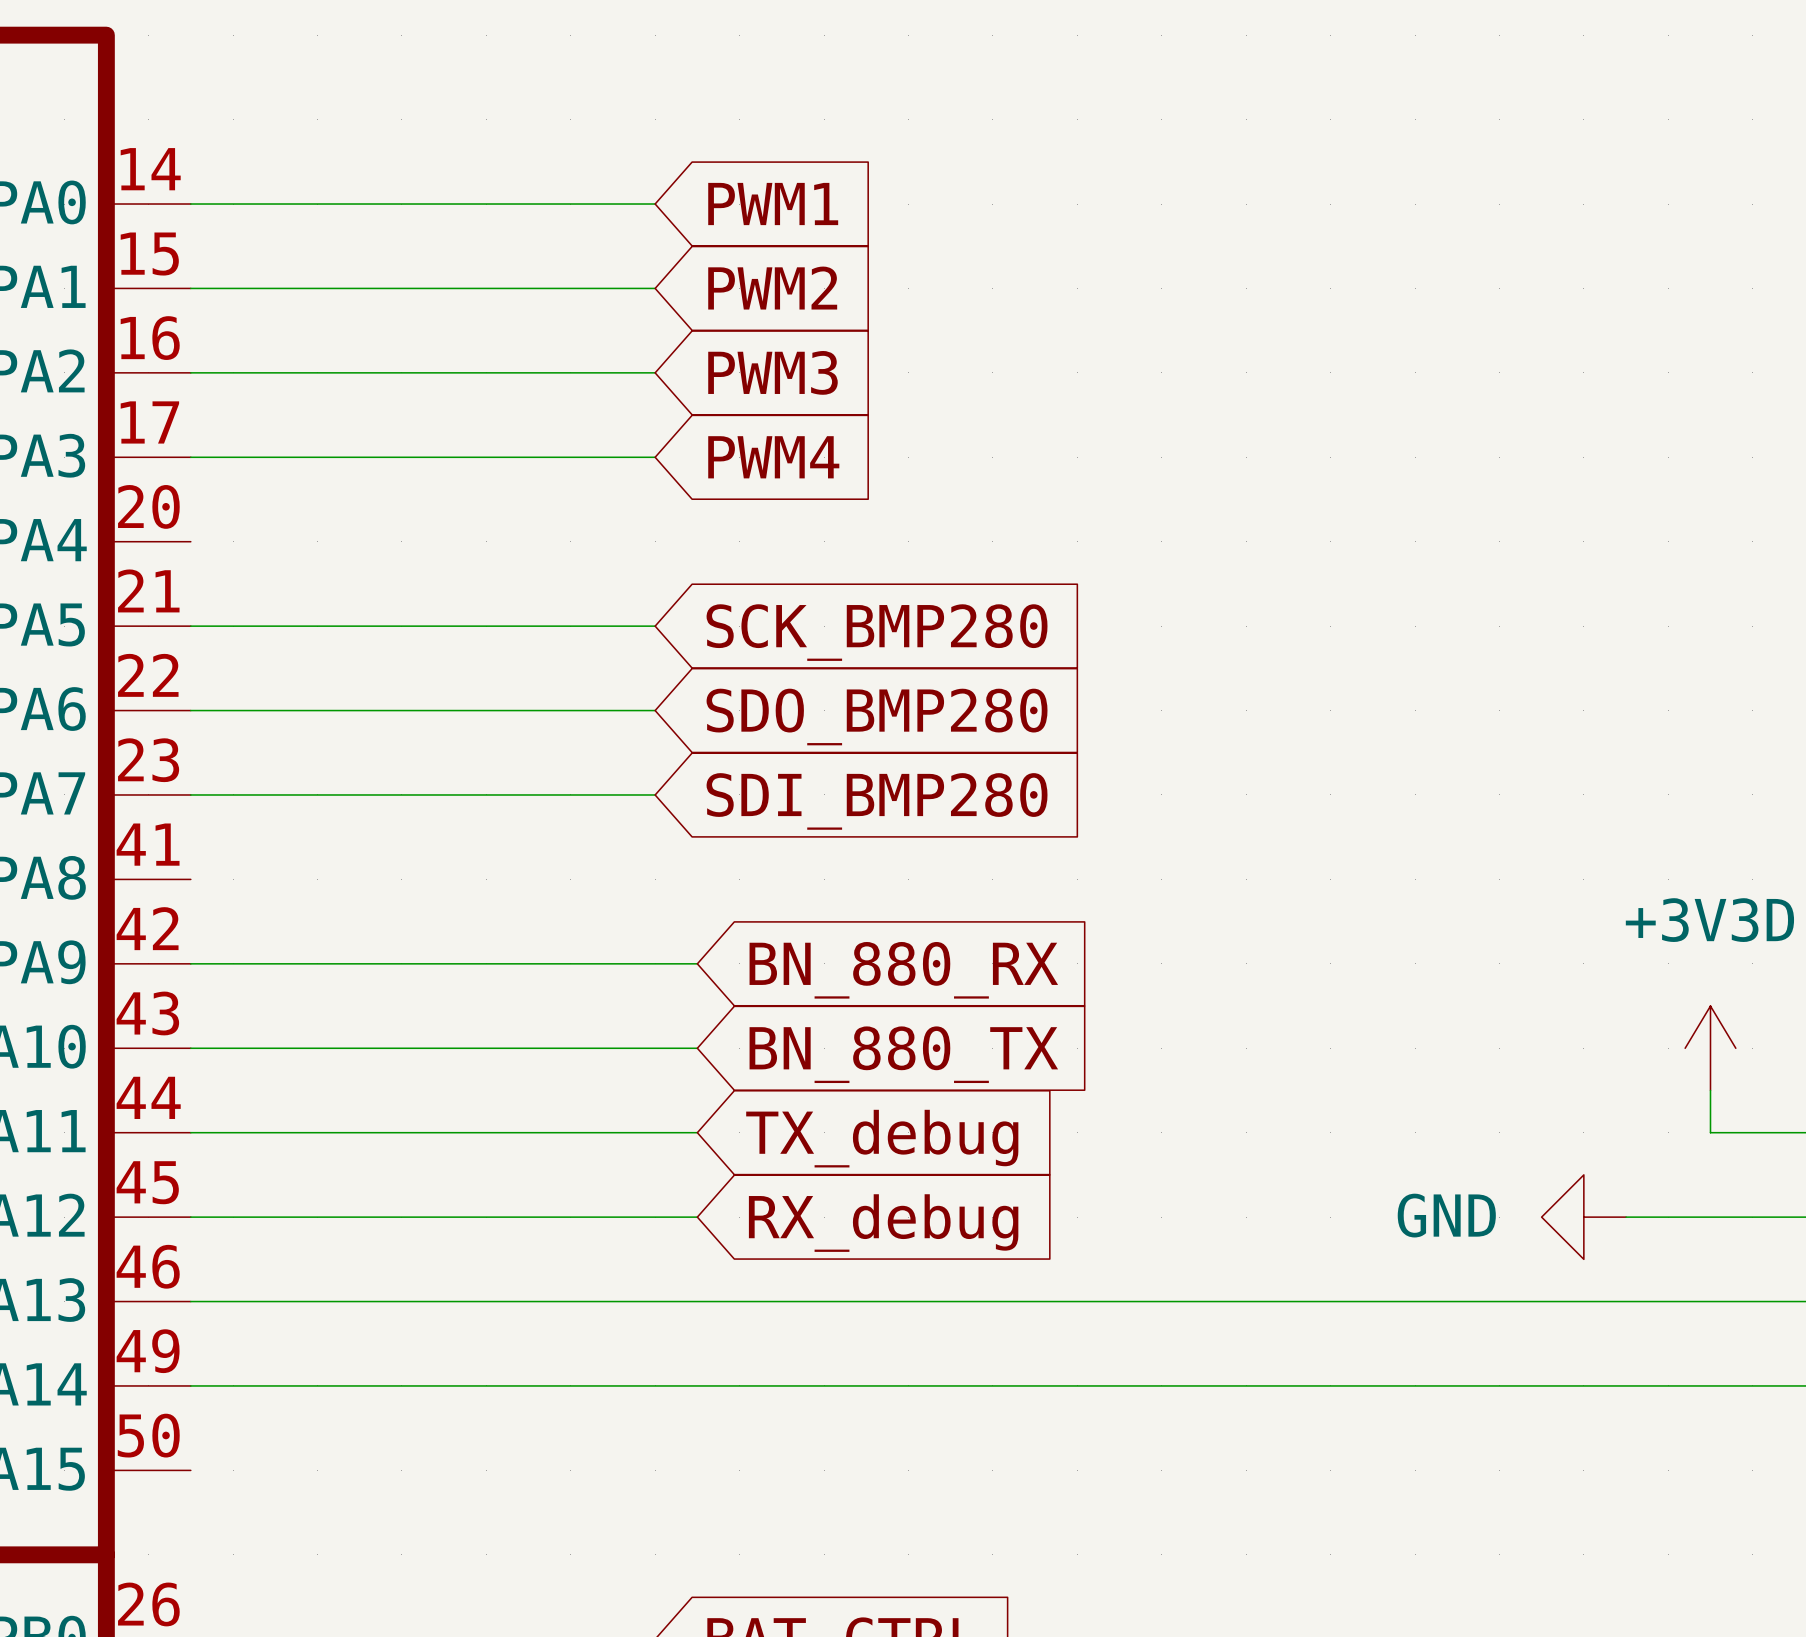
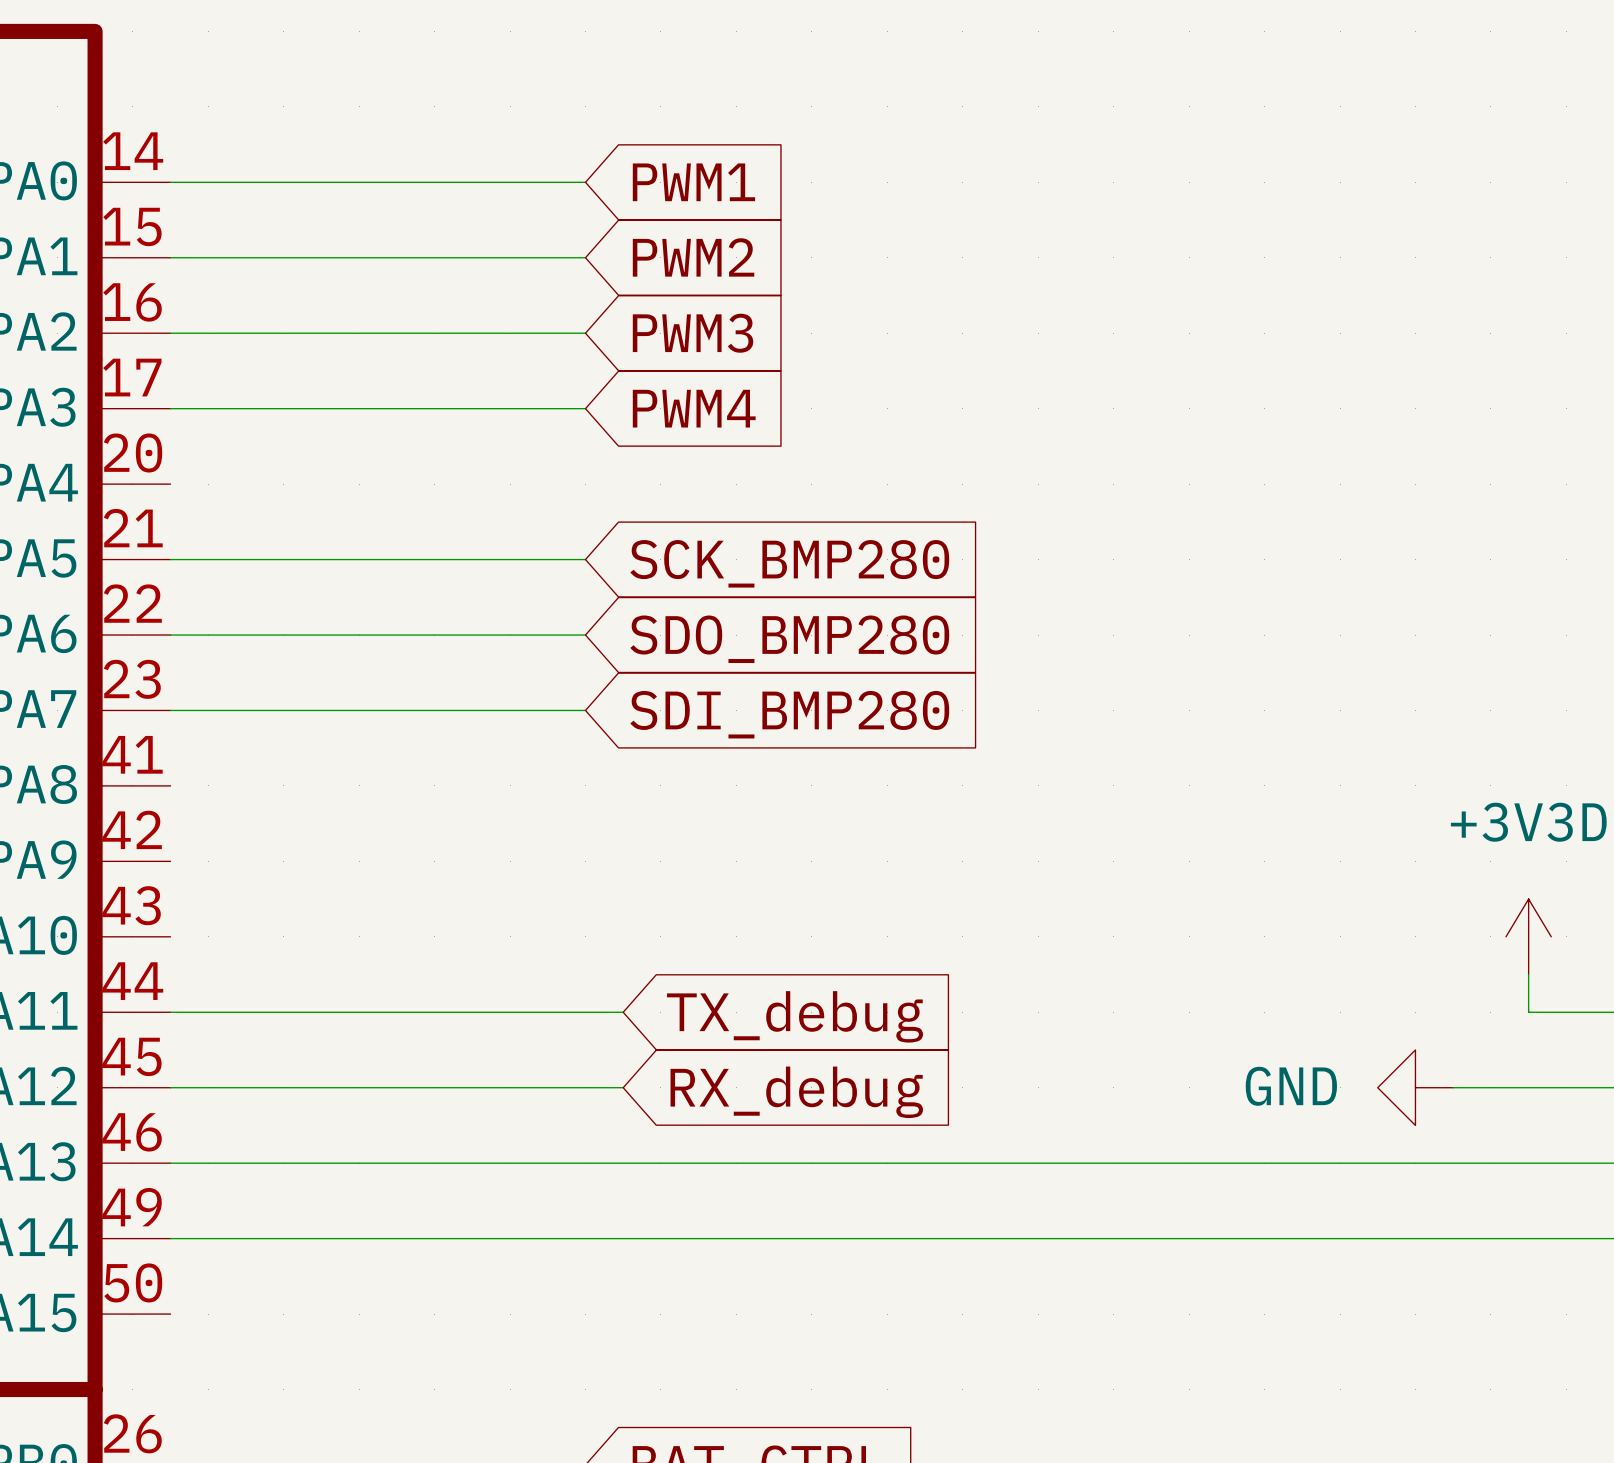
wire: (190, 963) (697, 963) -> none
global label: BN_880_RX (903, 970) -> none
wire: (190, 1048) (697, 1048) -> none
global label: BN_880_TX (903, 1054) -> none

